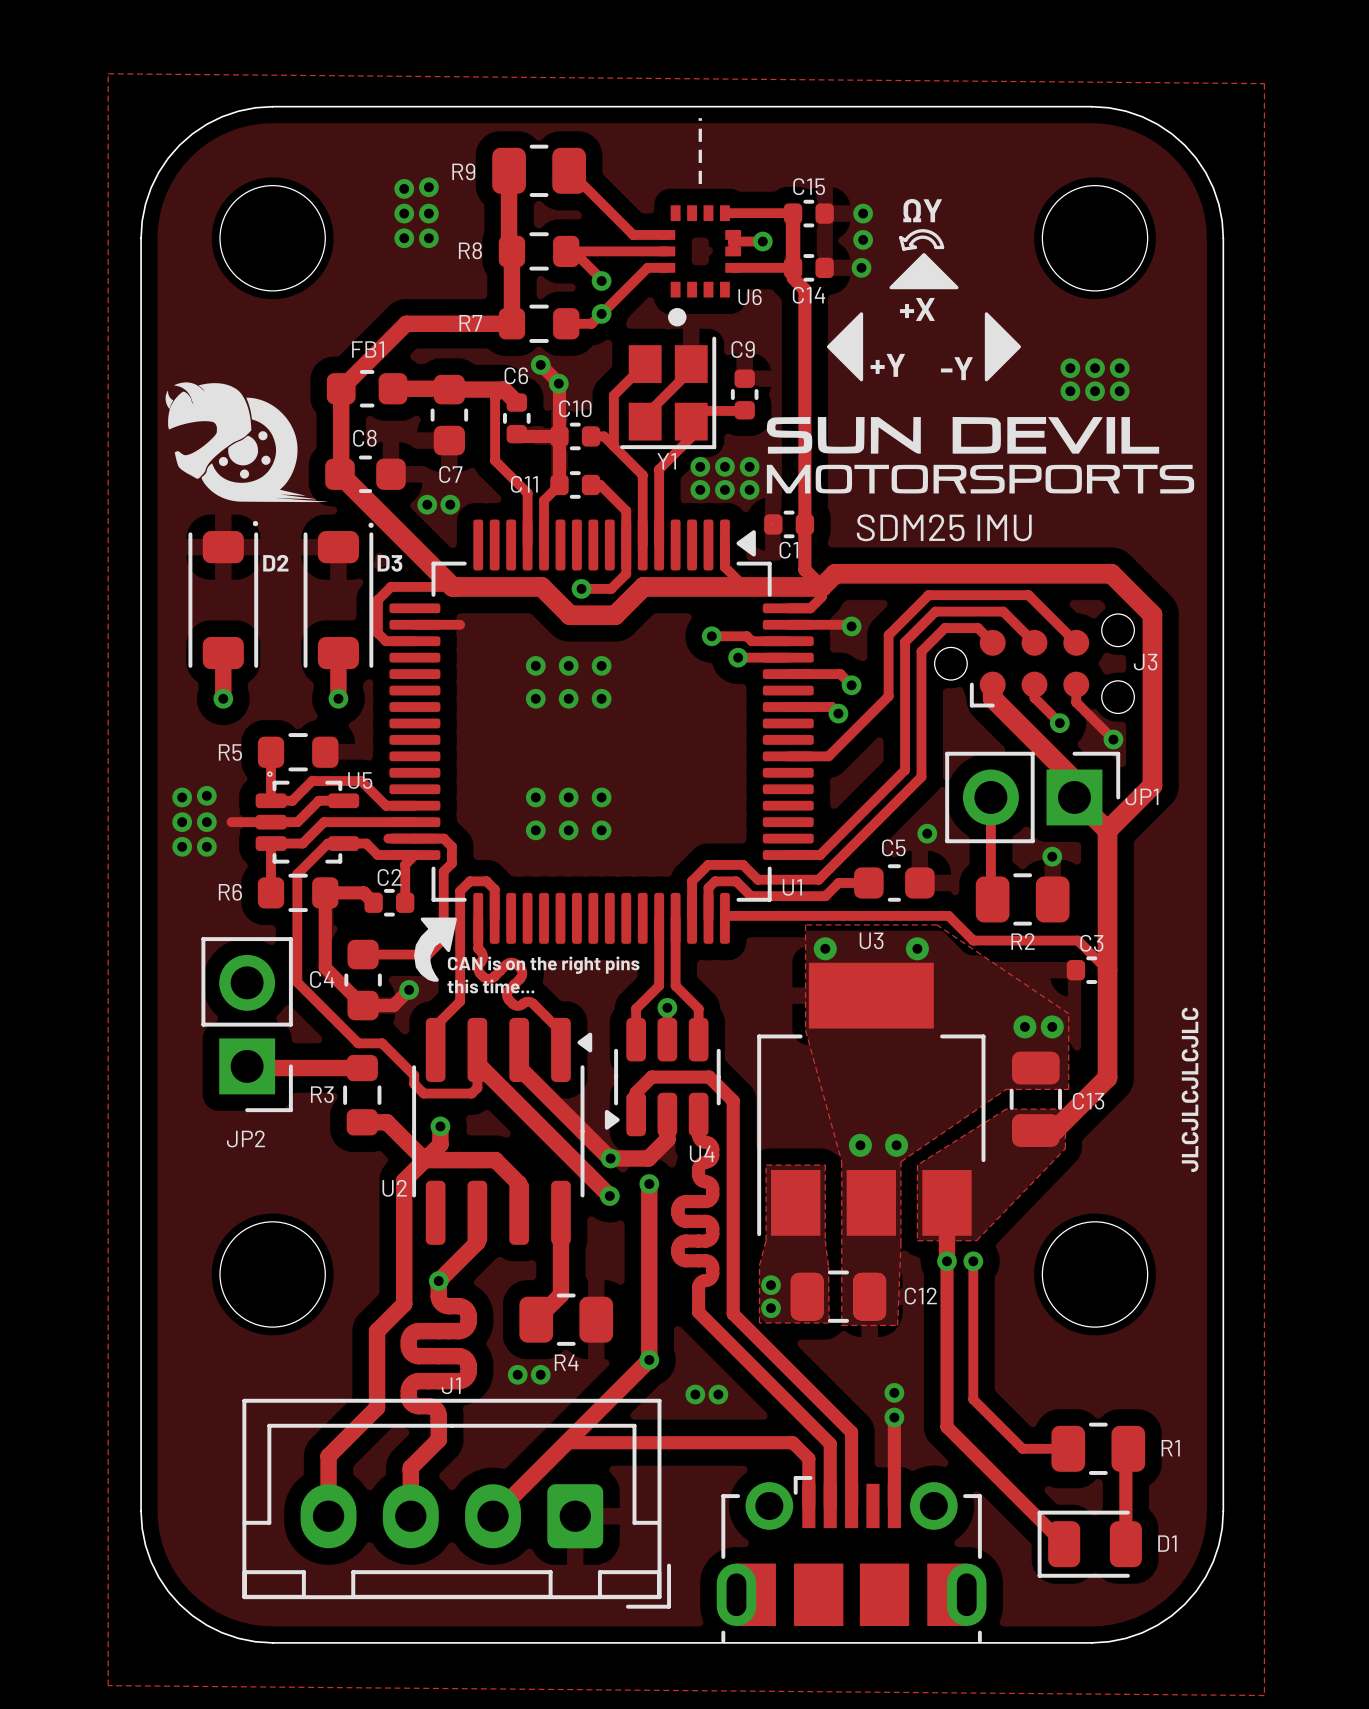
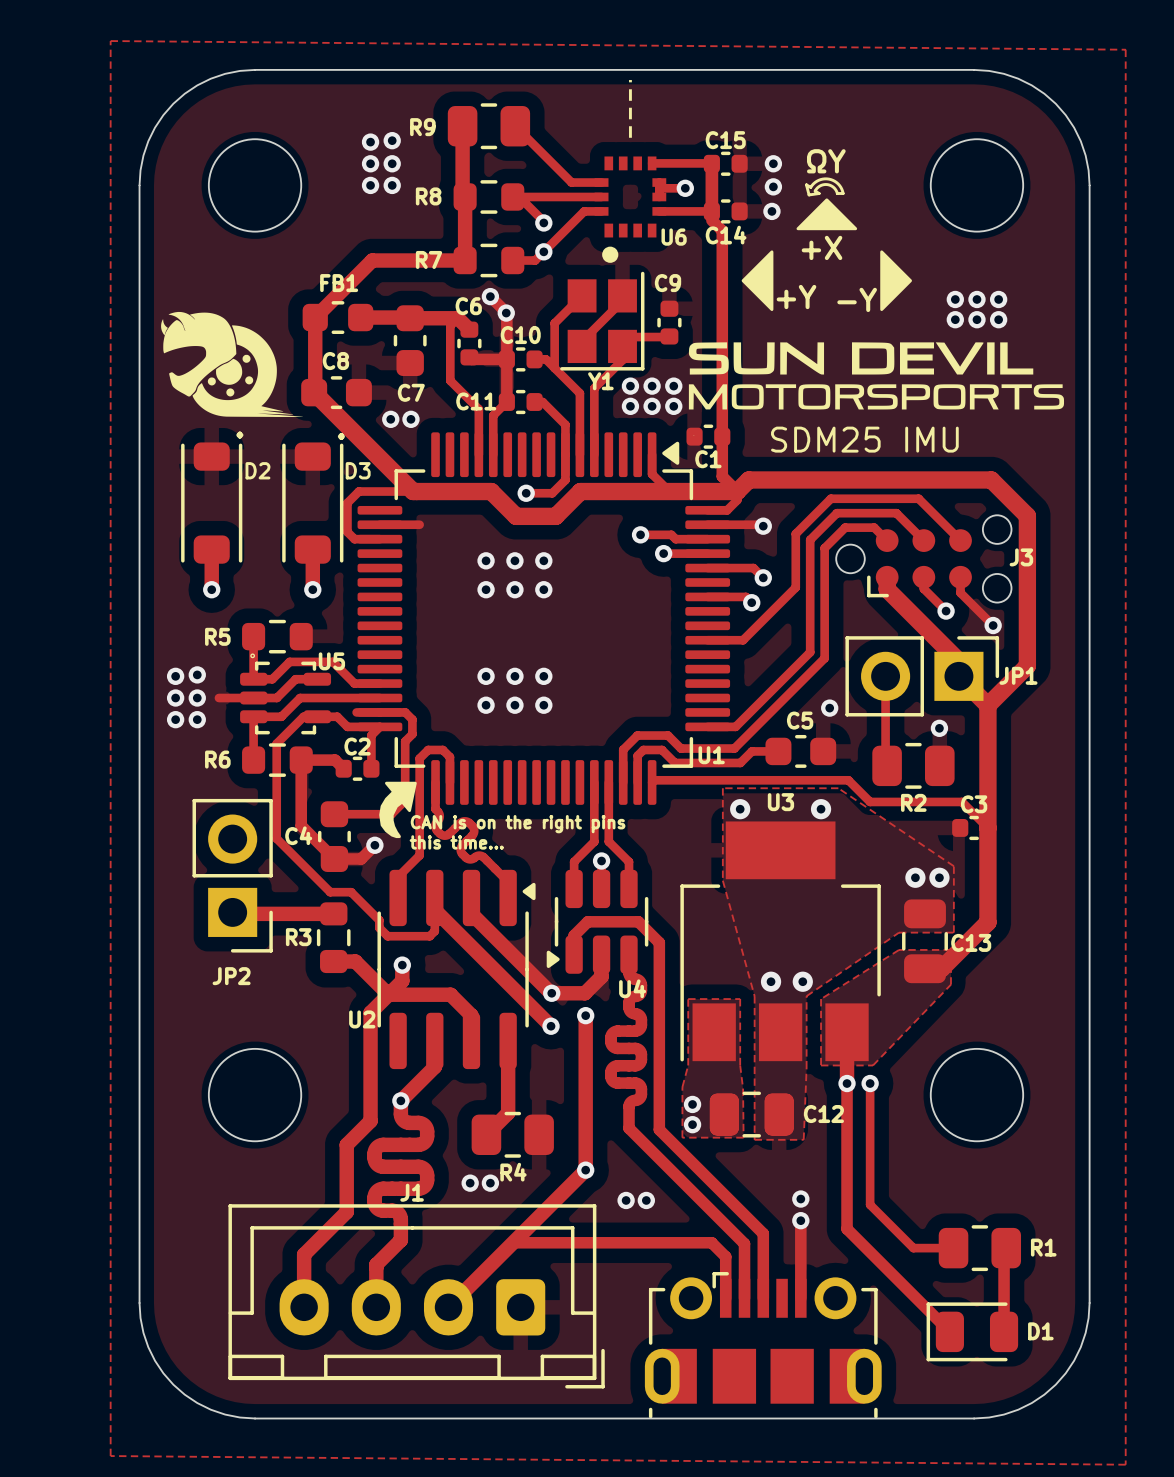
text: JLCJLCJLCJLC (1190, 1089) -> none

